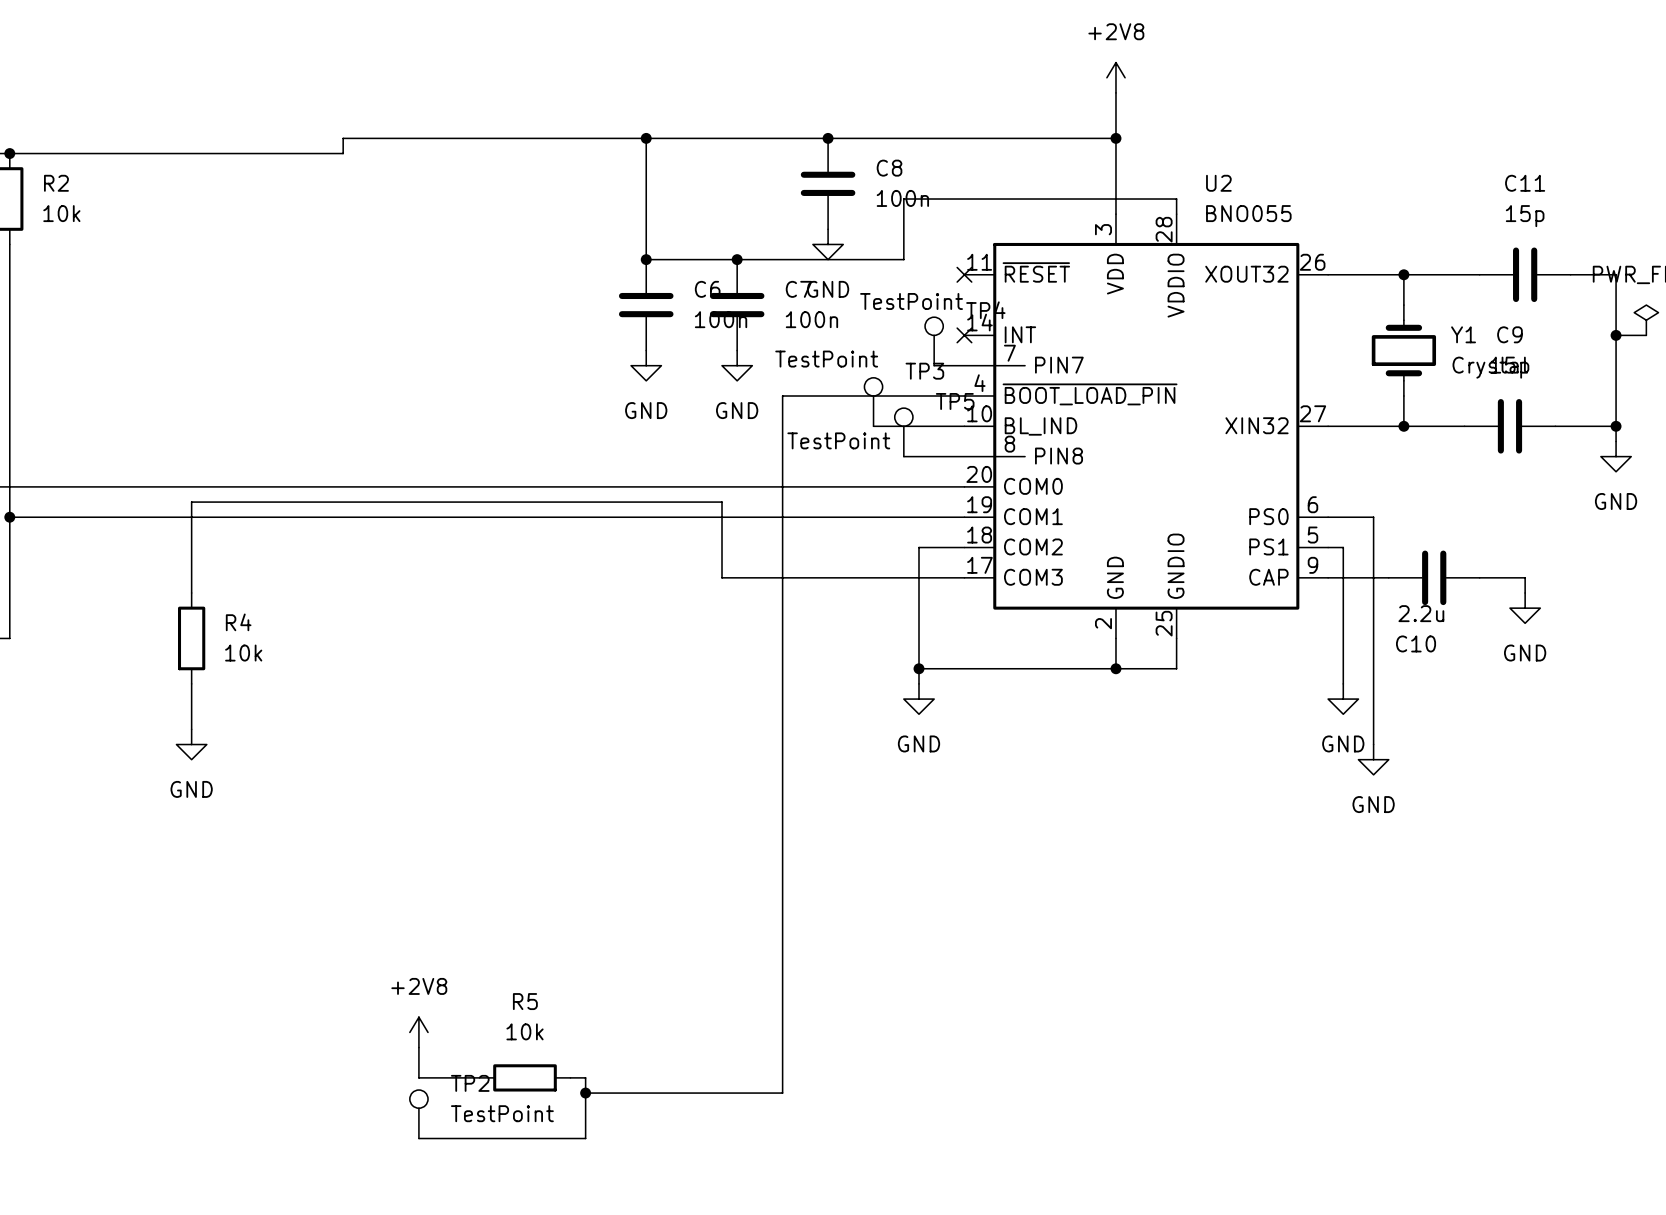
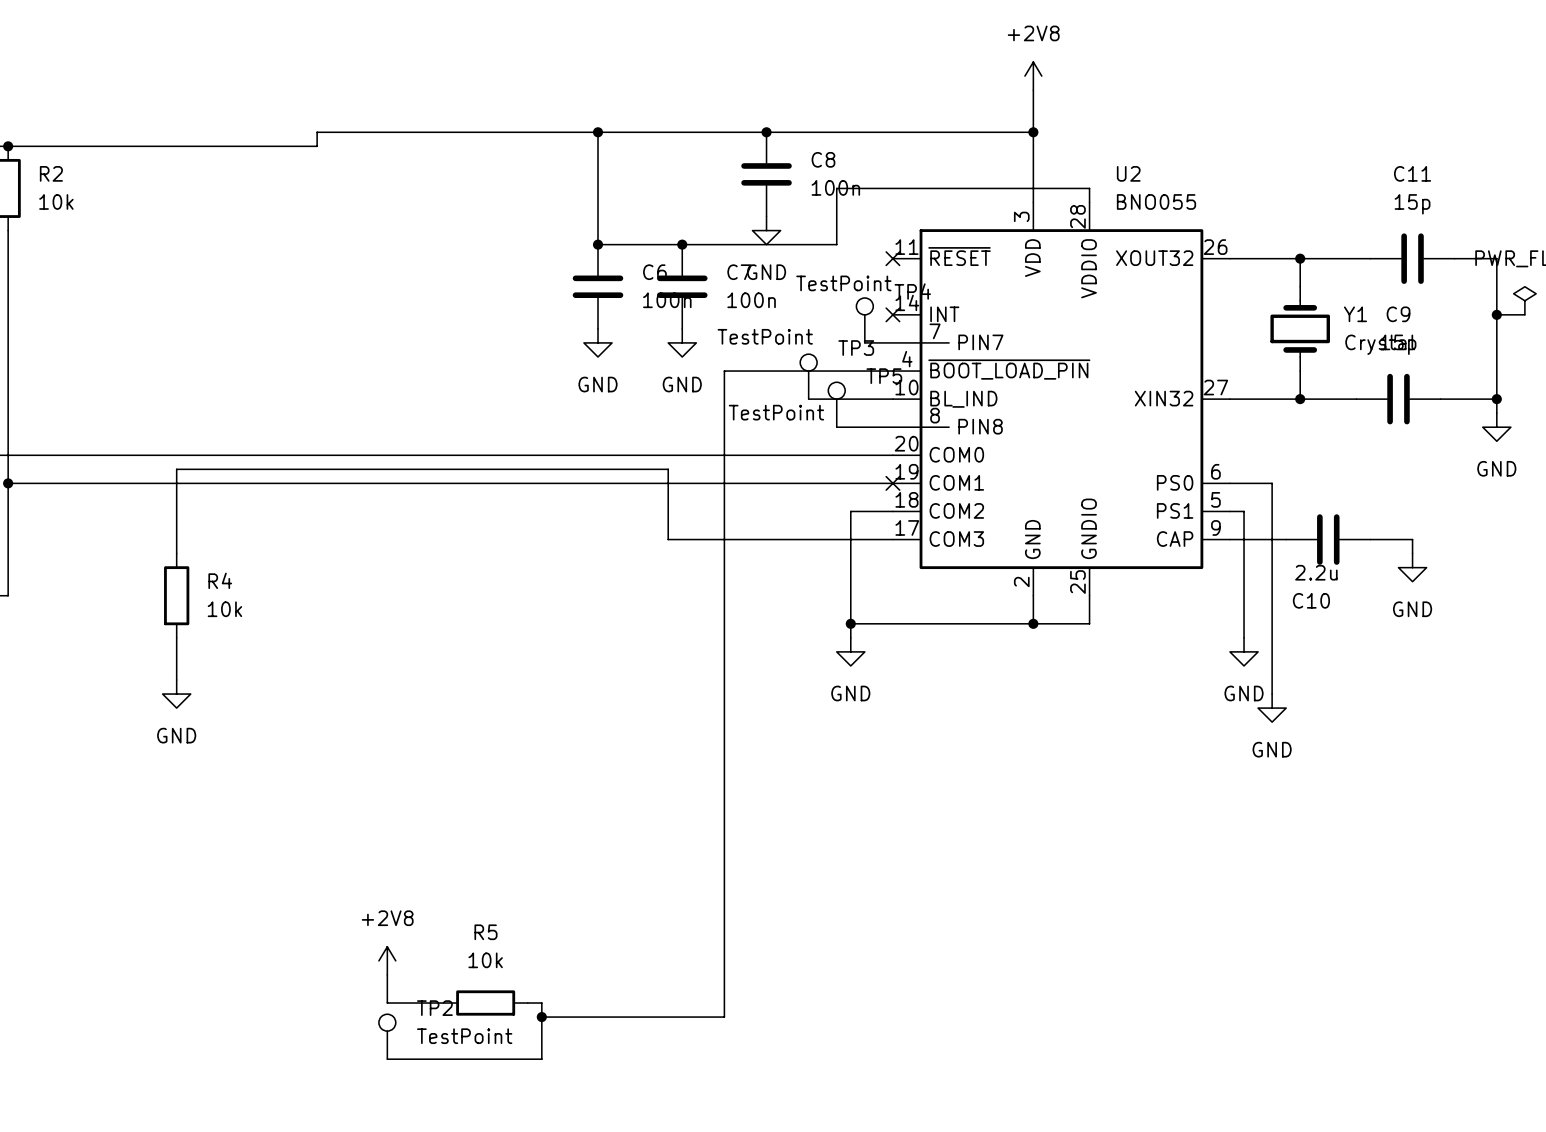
no-connect mark: none -> (892, 483)

